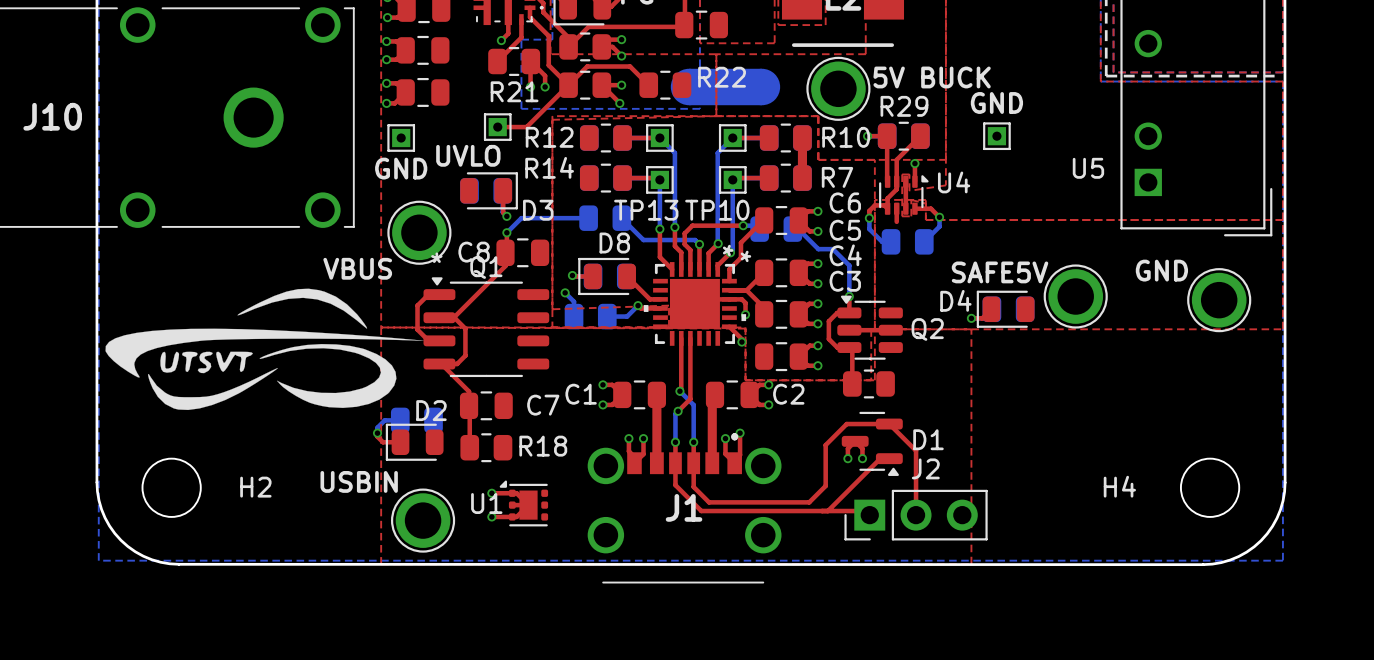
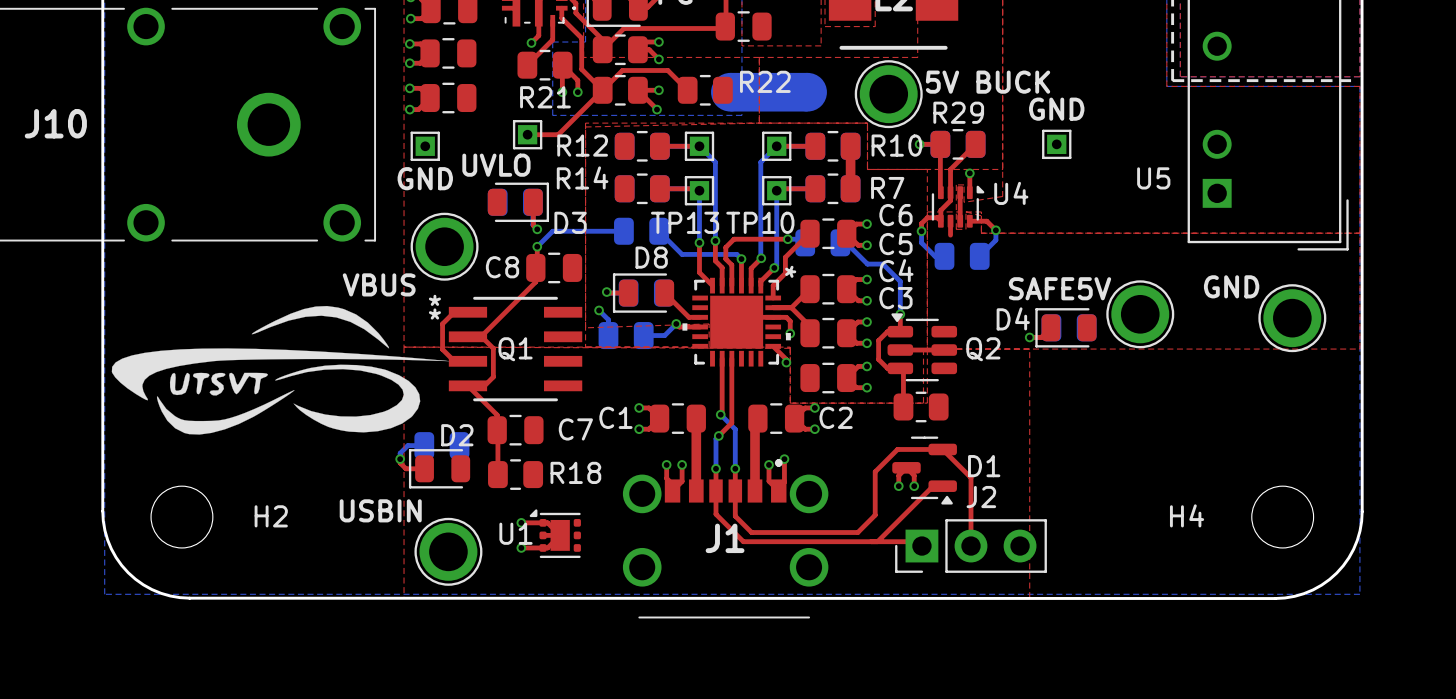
part text: * (728, 250) -> none
Q1 name position: Q1 (486, 267) -> Q1 (515, 349)
Q1 footprint: [423, 277, 550, 378] -> [448, 296, 583, 402]

